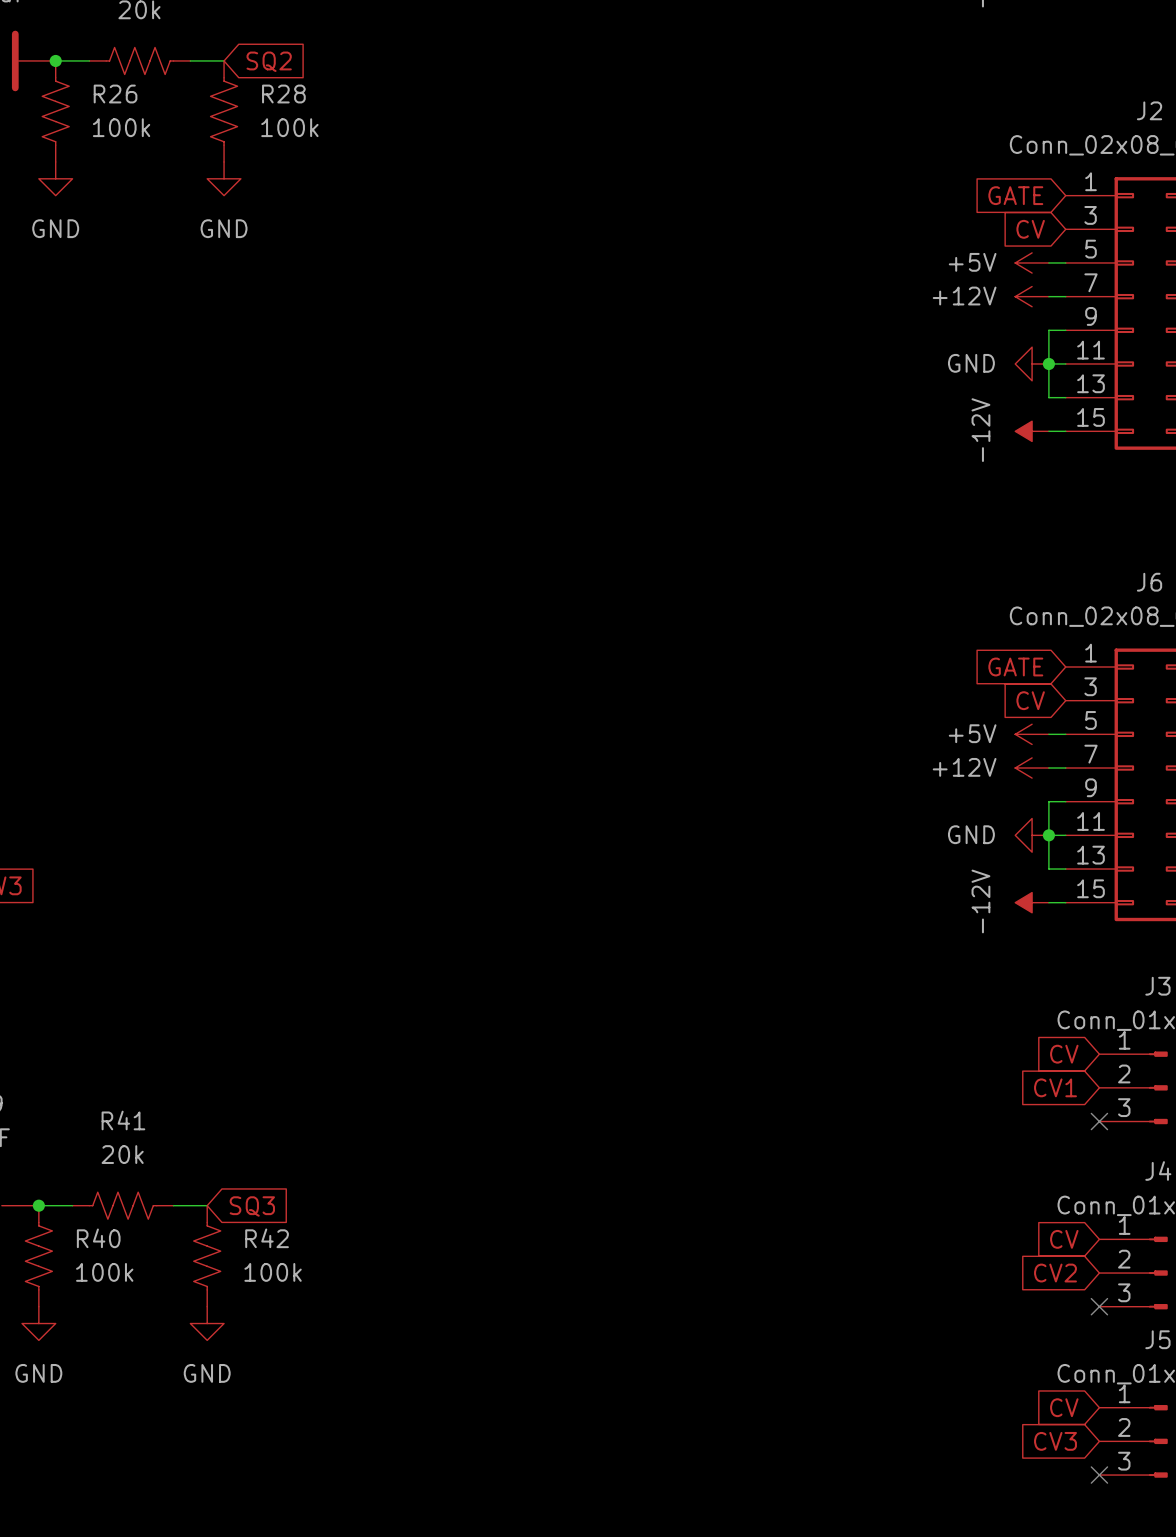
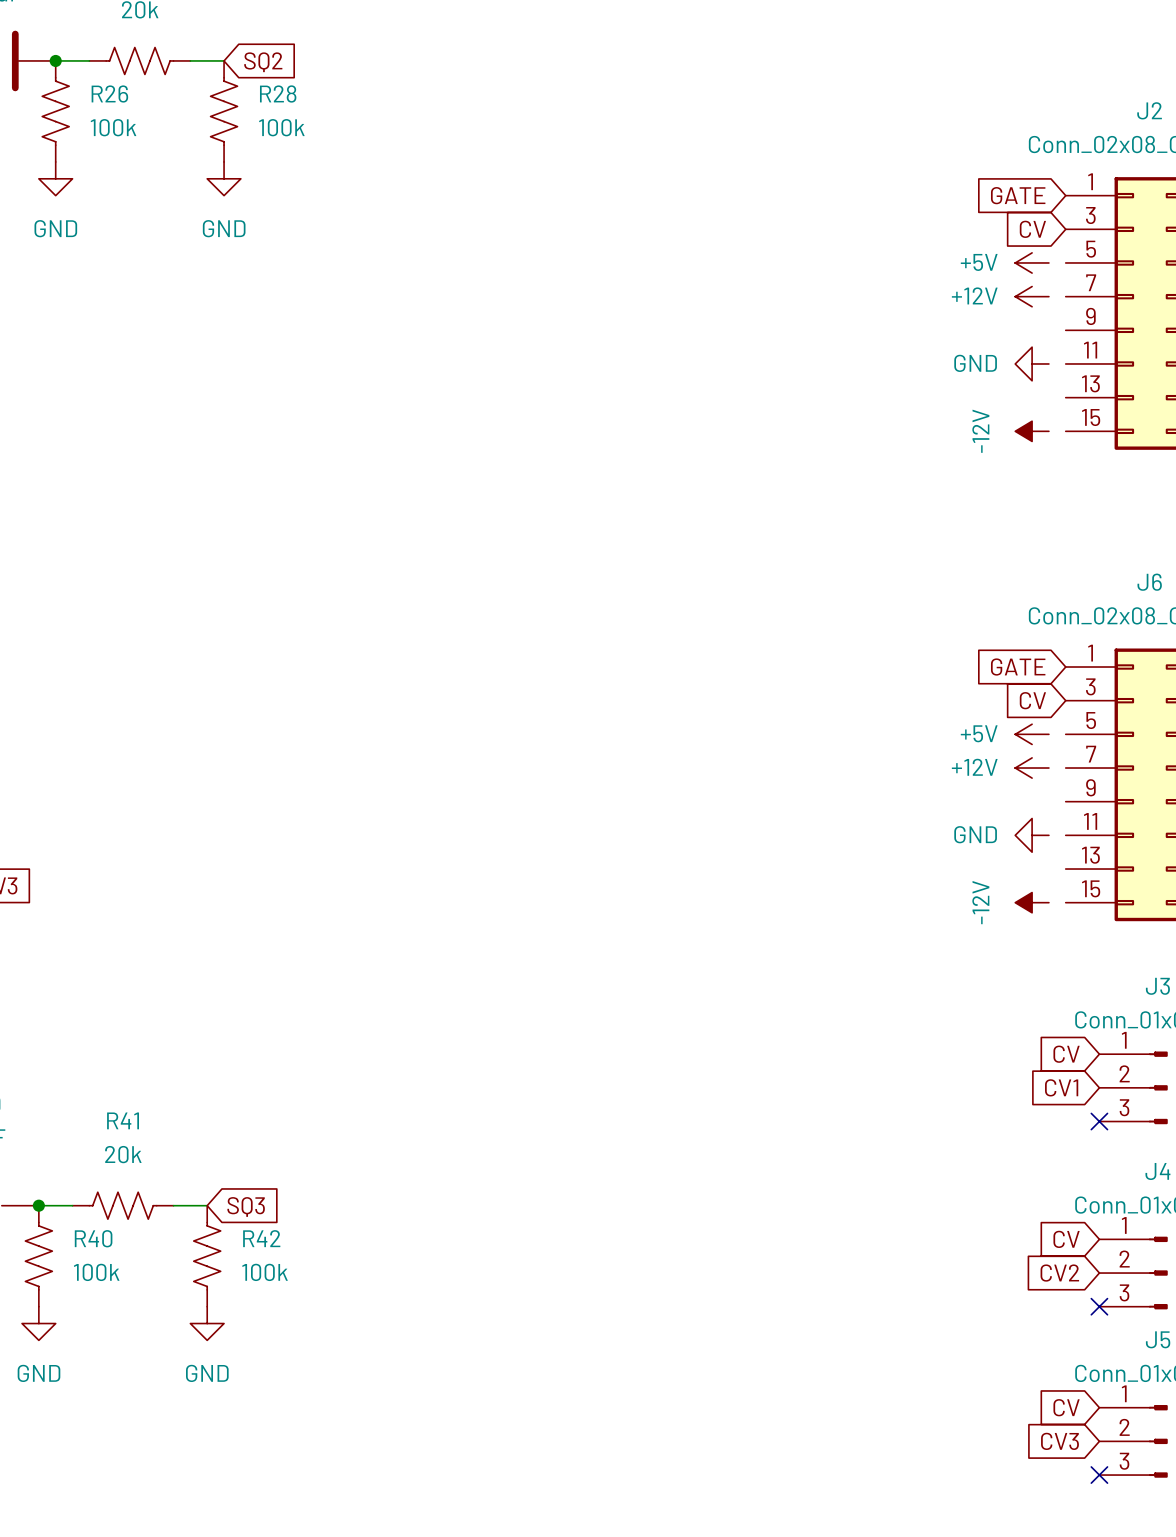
wire: (1048, 262) (1065, 262) -> none
wire: (1048, 296) (1065, 296) -> none
wire: (1065, 330) (1048, 330) (1048, 397) (1065, 397) -> none
wire: (1048, 363) (1065, 363) -> none
junction: (1048, 363) -> none
wire: (1048, 431) (1065, 431) -> none
wire: (1048, 734) (1065, 734) -> none
wire: (1048, 768) (1065, 768) -> none
wire: (1065, 801) (1048, 801) (1048, 869) (1065, 869) -> none
wire: (1048, 835) (1065, 835) -> none
junction: (1048, 835) -> none
wire: (1048, 902) (1065, 902) -> none

